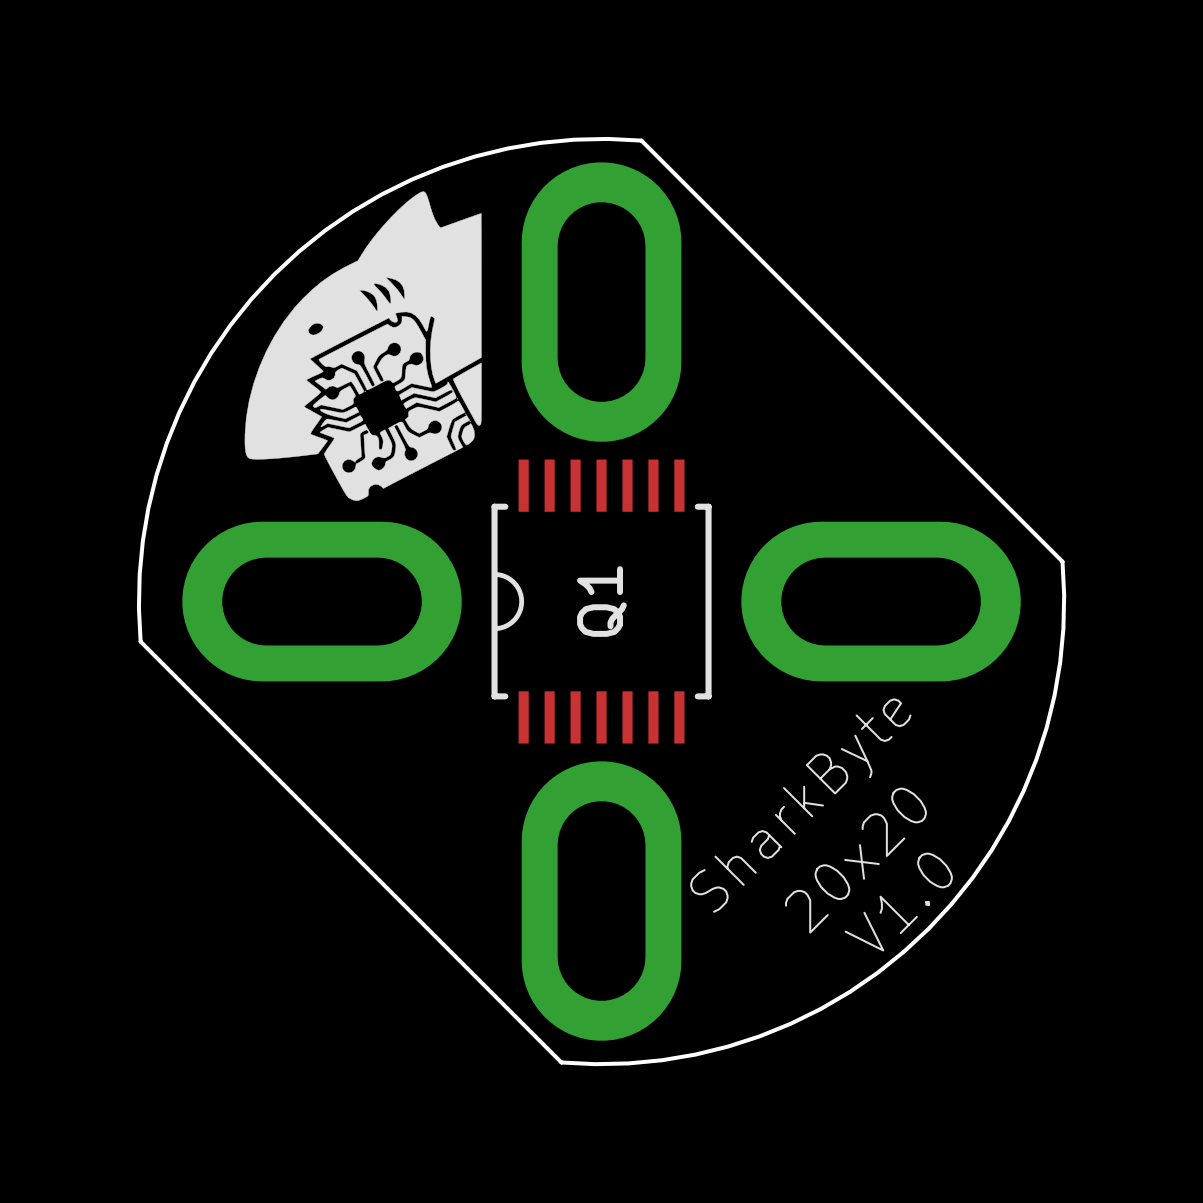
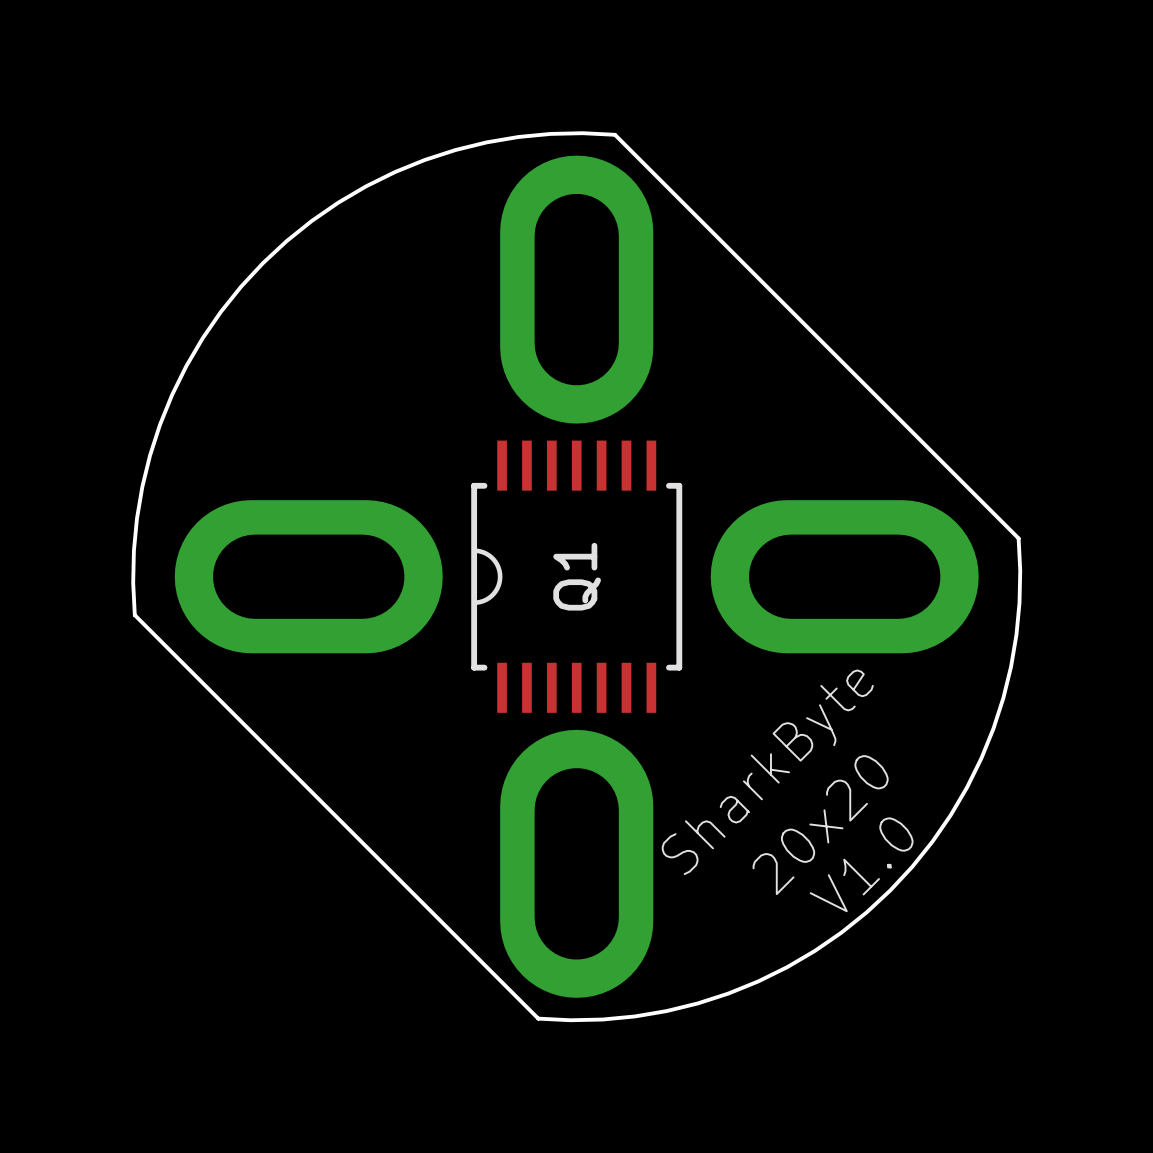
drawing: [244, 191, 482, 501] -> none

